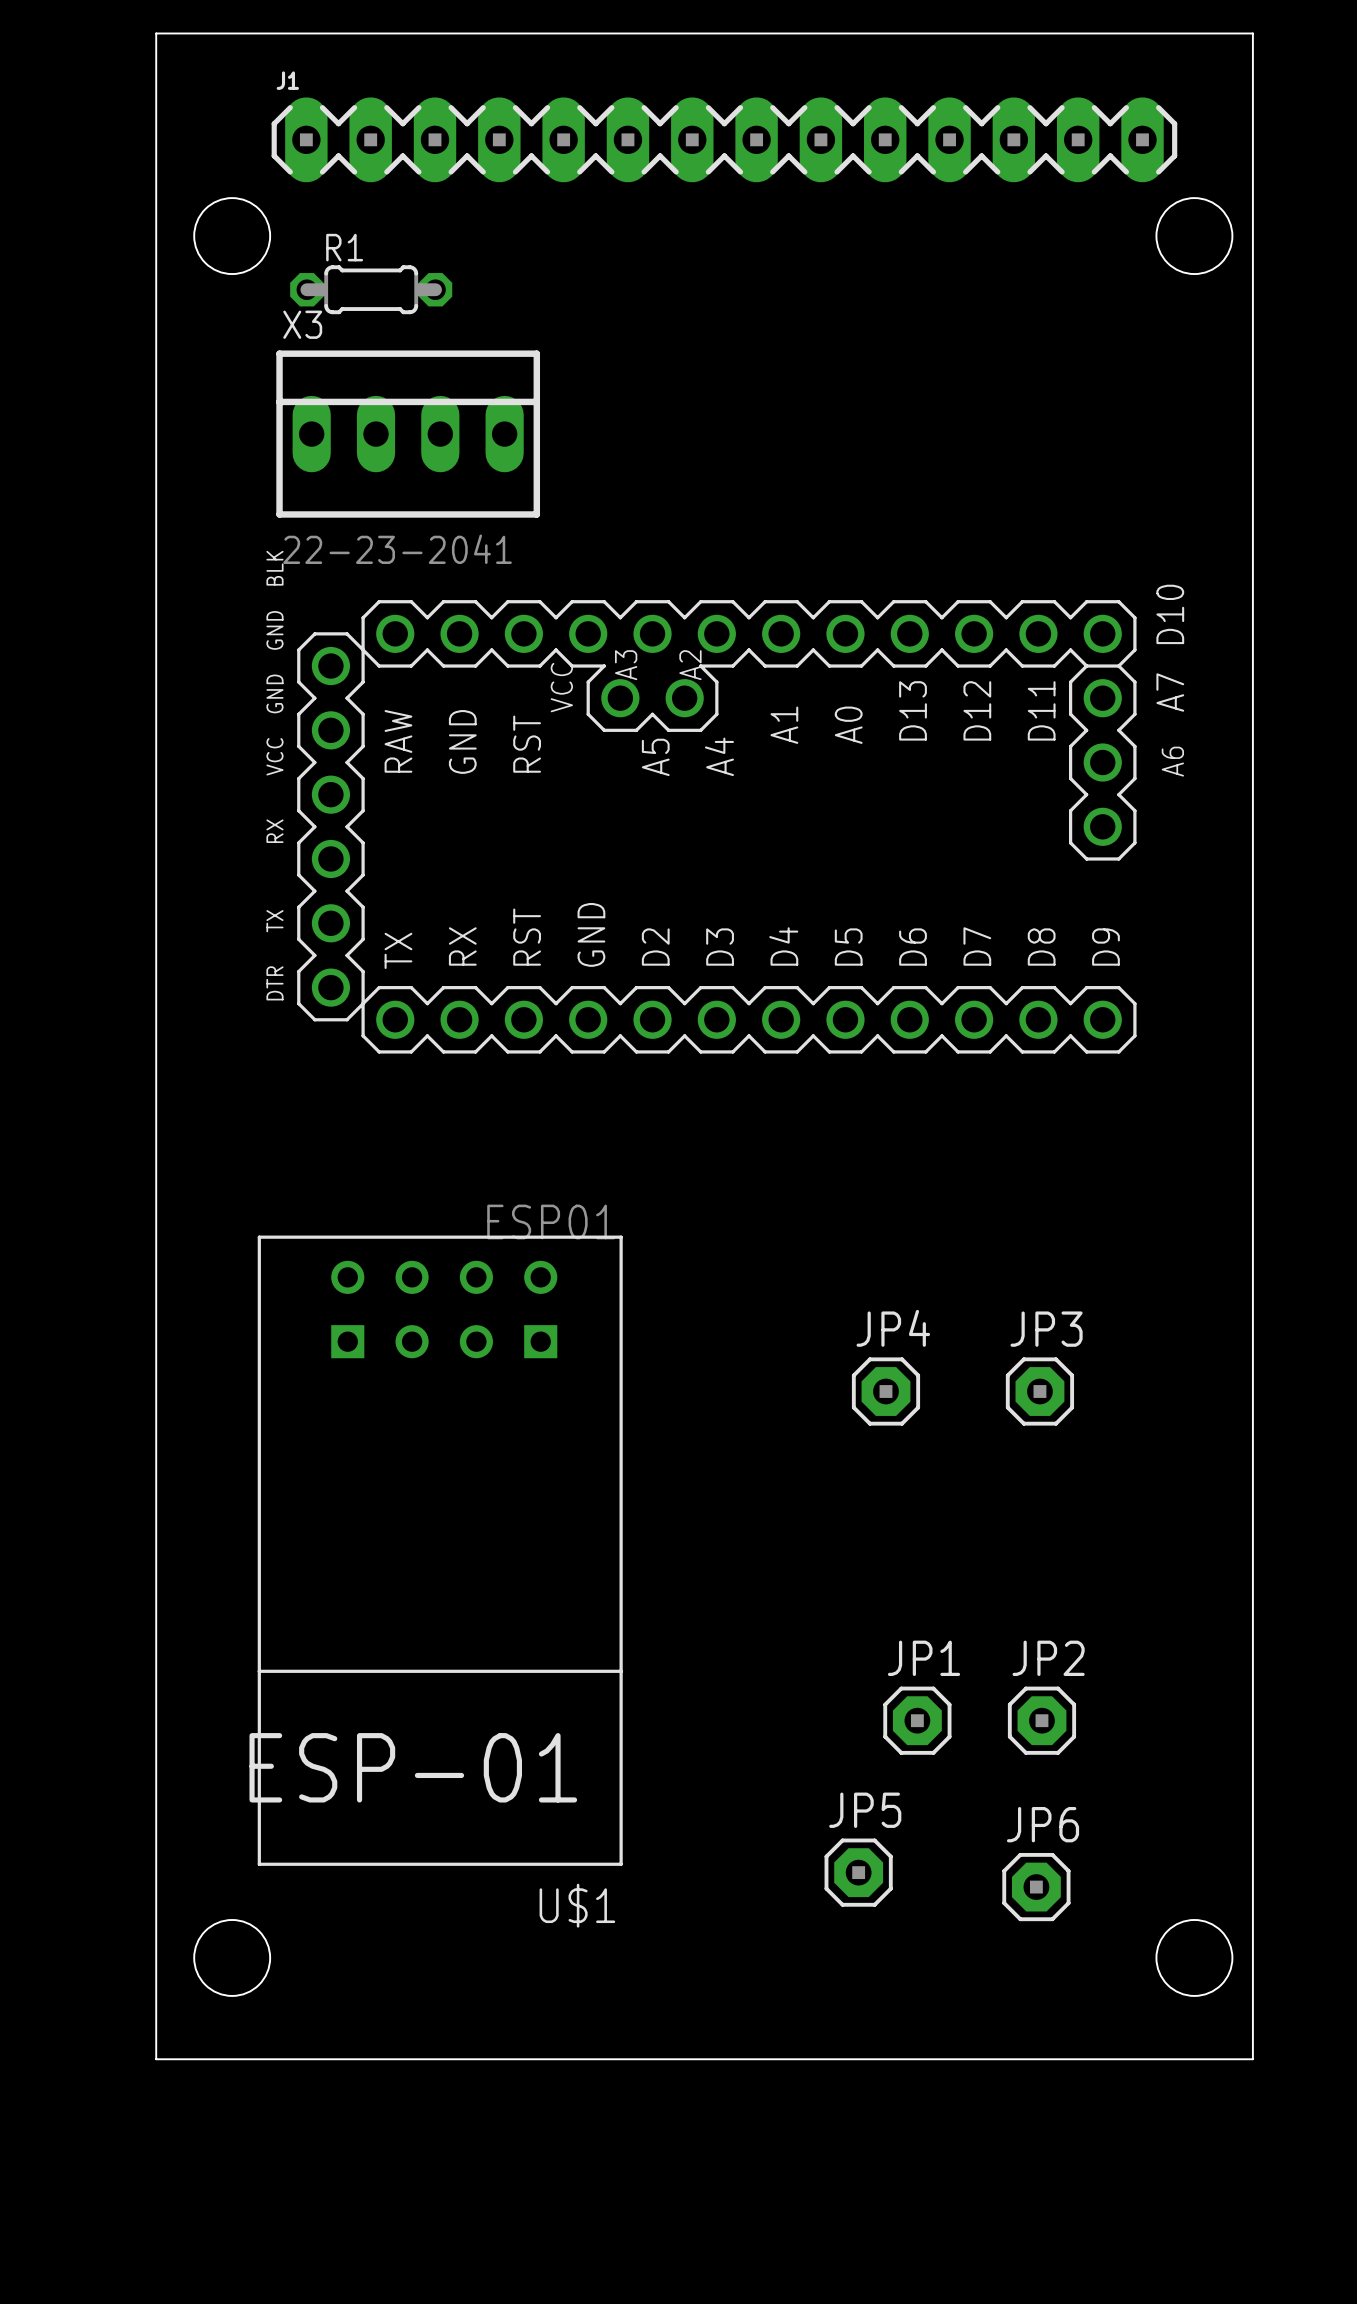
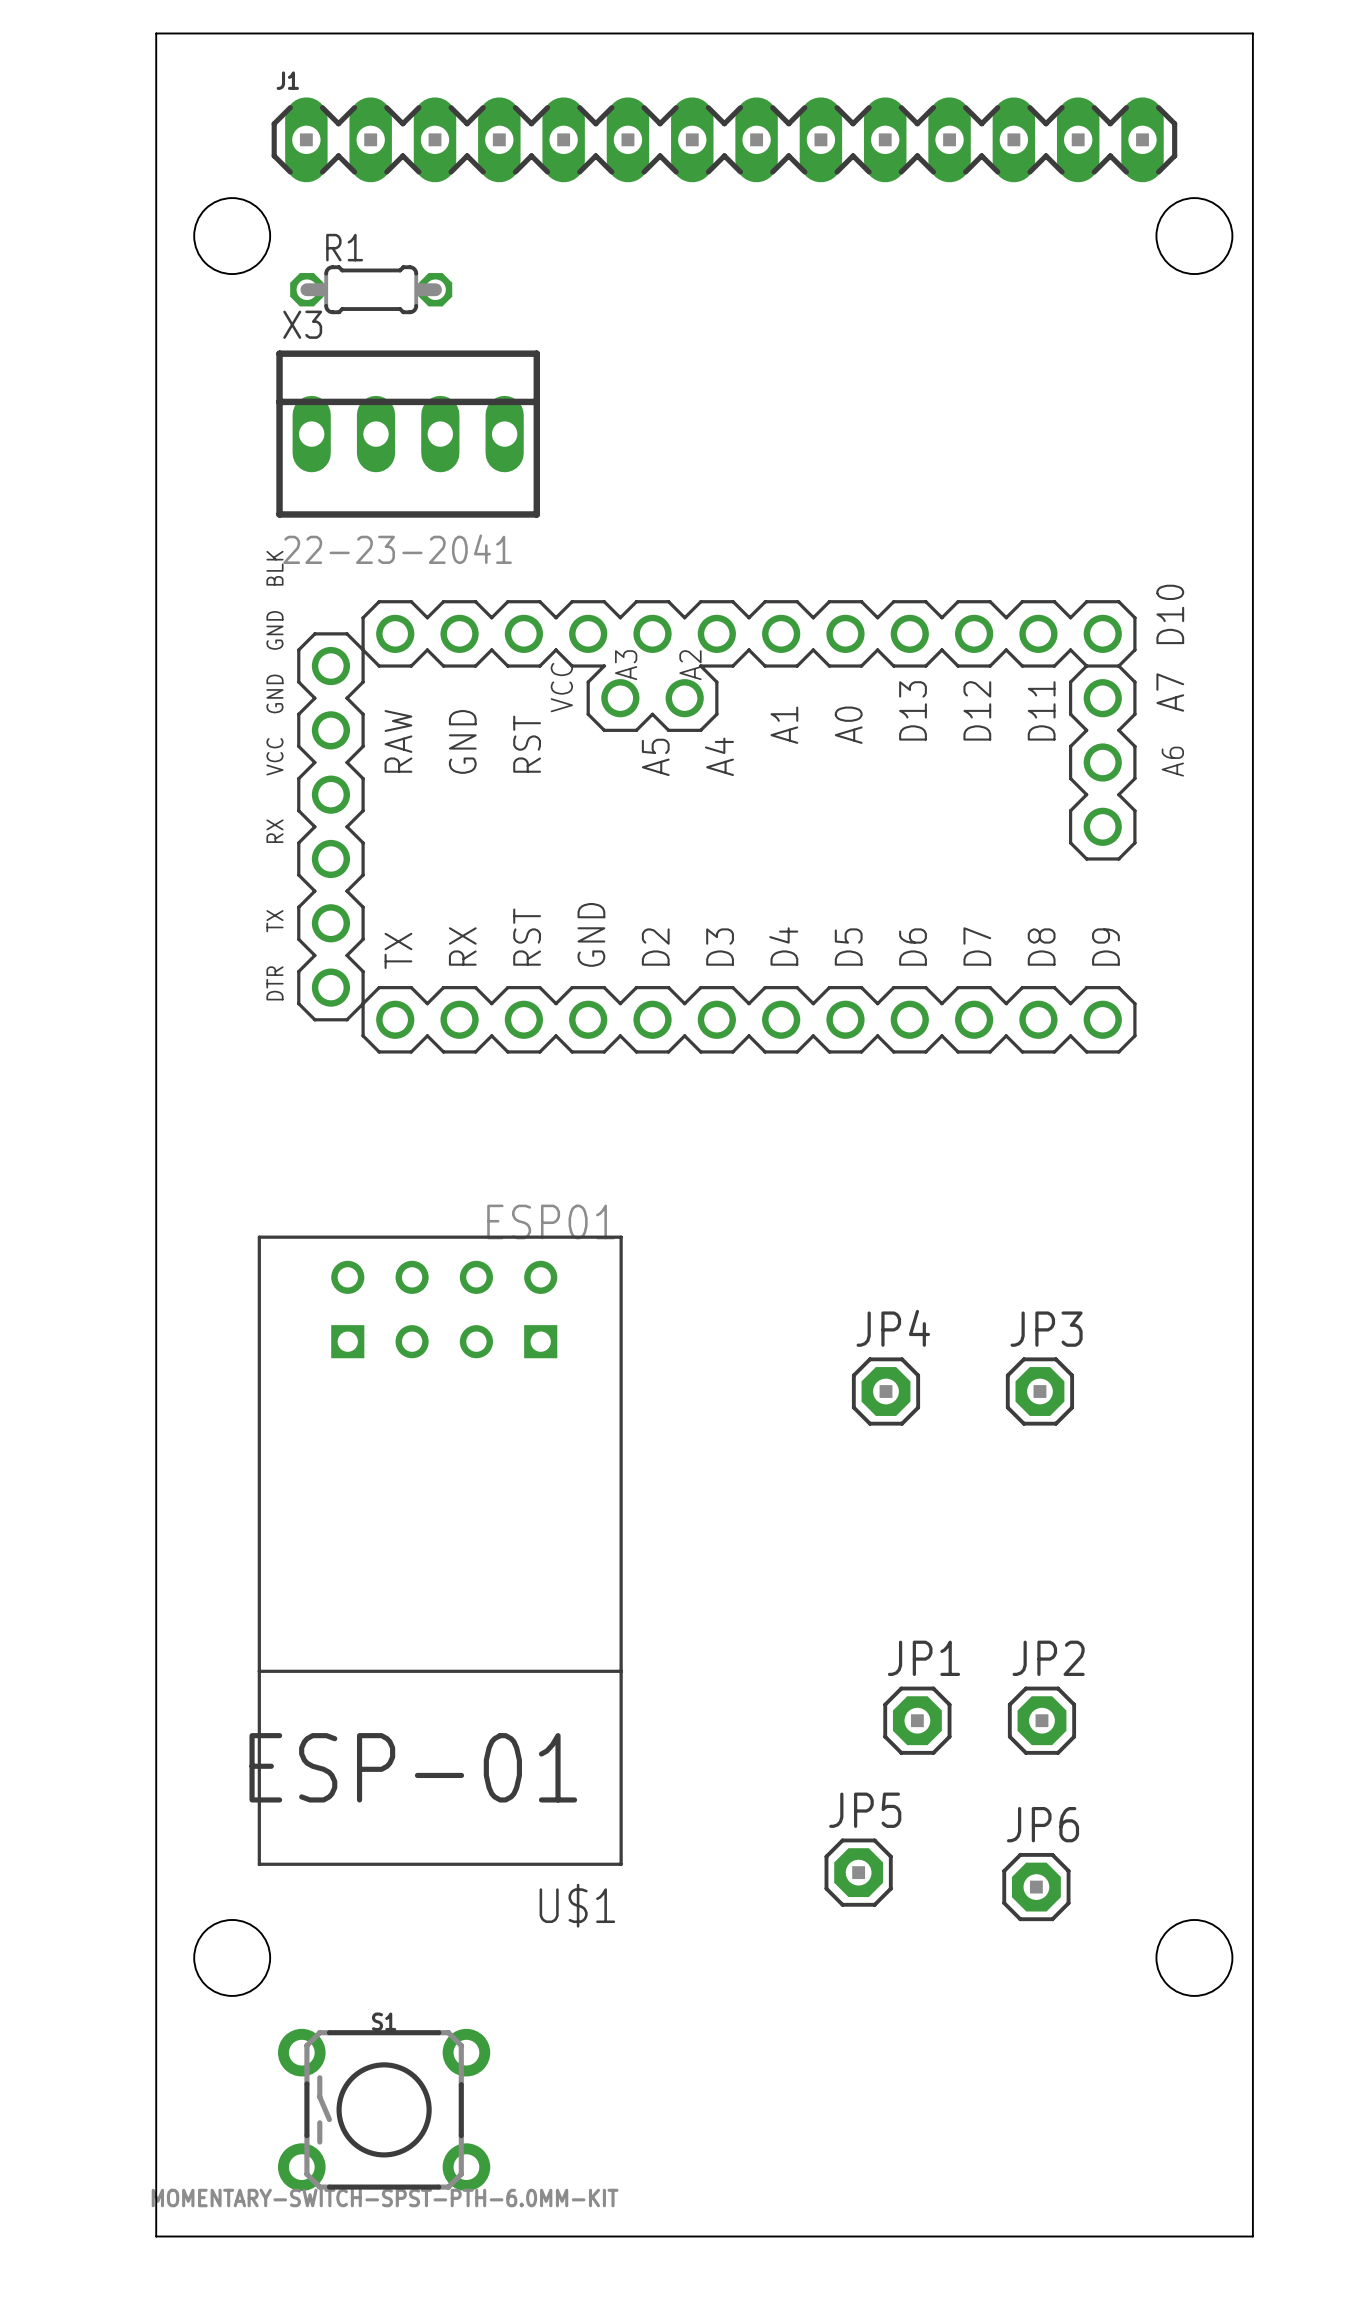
board edge: (156, 2059) (1252, 2059) -> (156, 2059) (156, 2236) (1252, 2236) (1252, 2059)
S1: none -> MOMENTARY-SWITCH-SPST-PTH-6.0MM-KIT (384, 2109)

